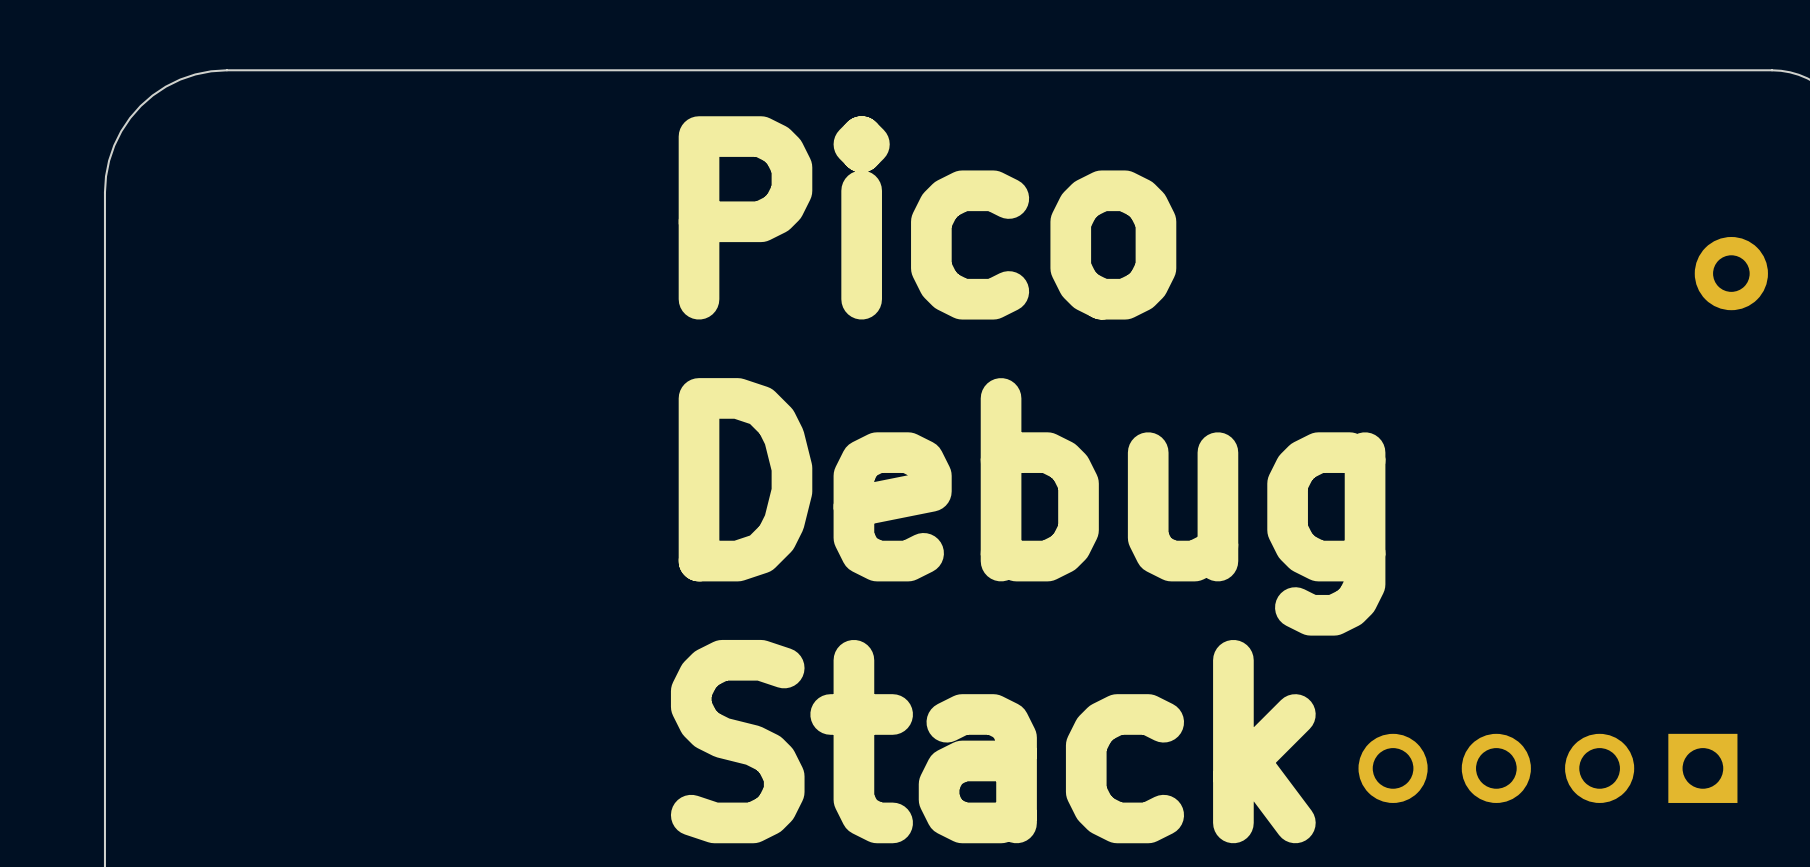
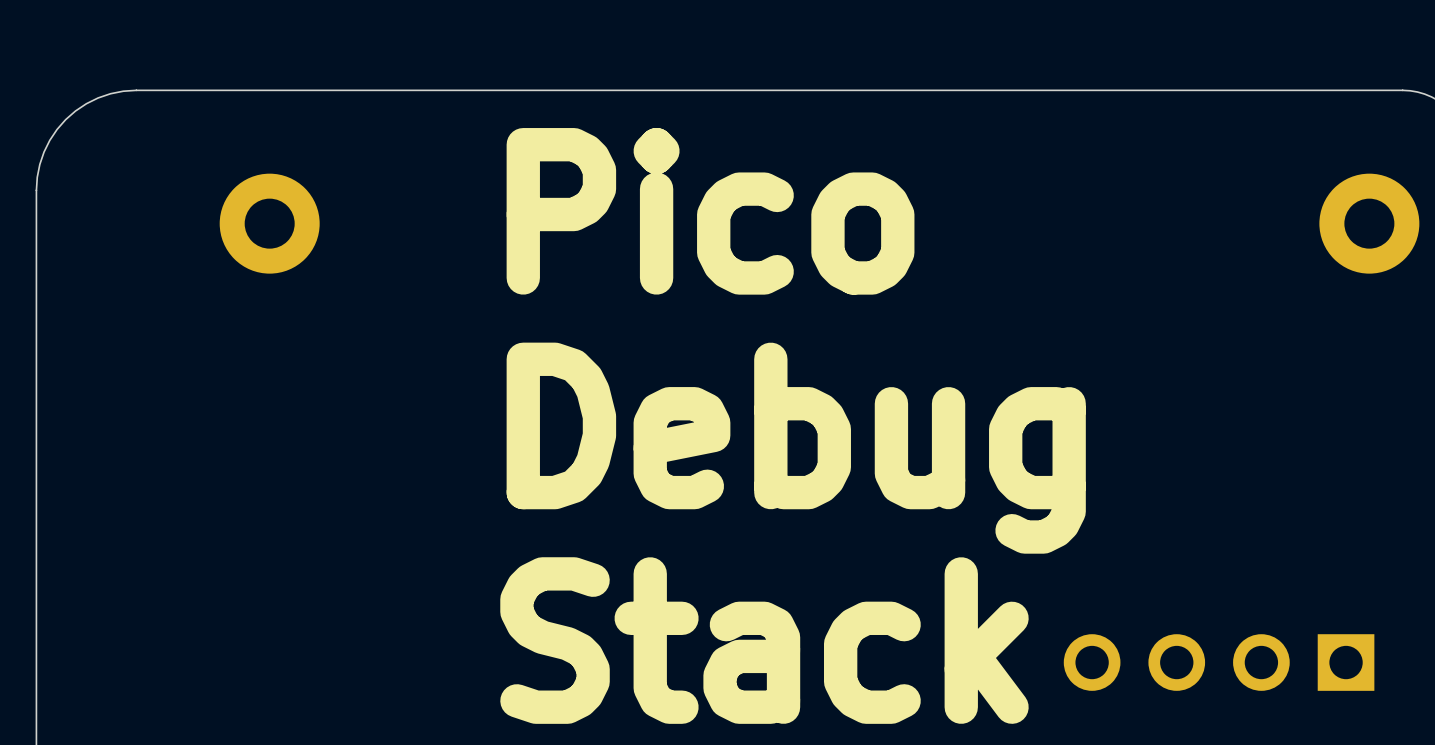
part: none -> (269, 223)
part: none -> (1369, 223)
part: (1731, 273) -> none

